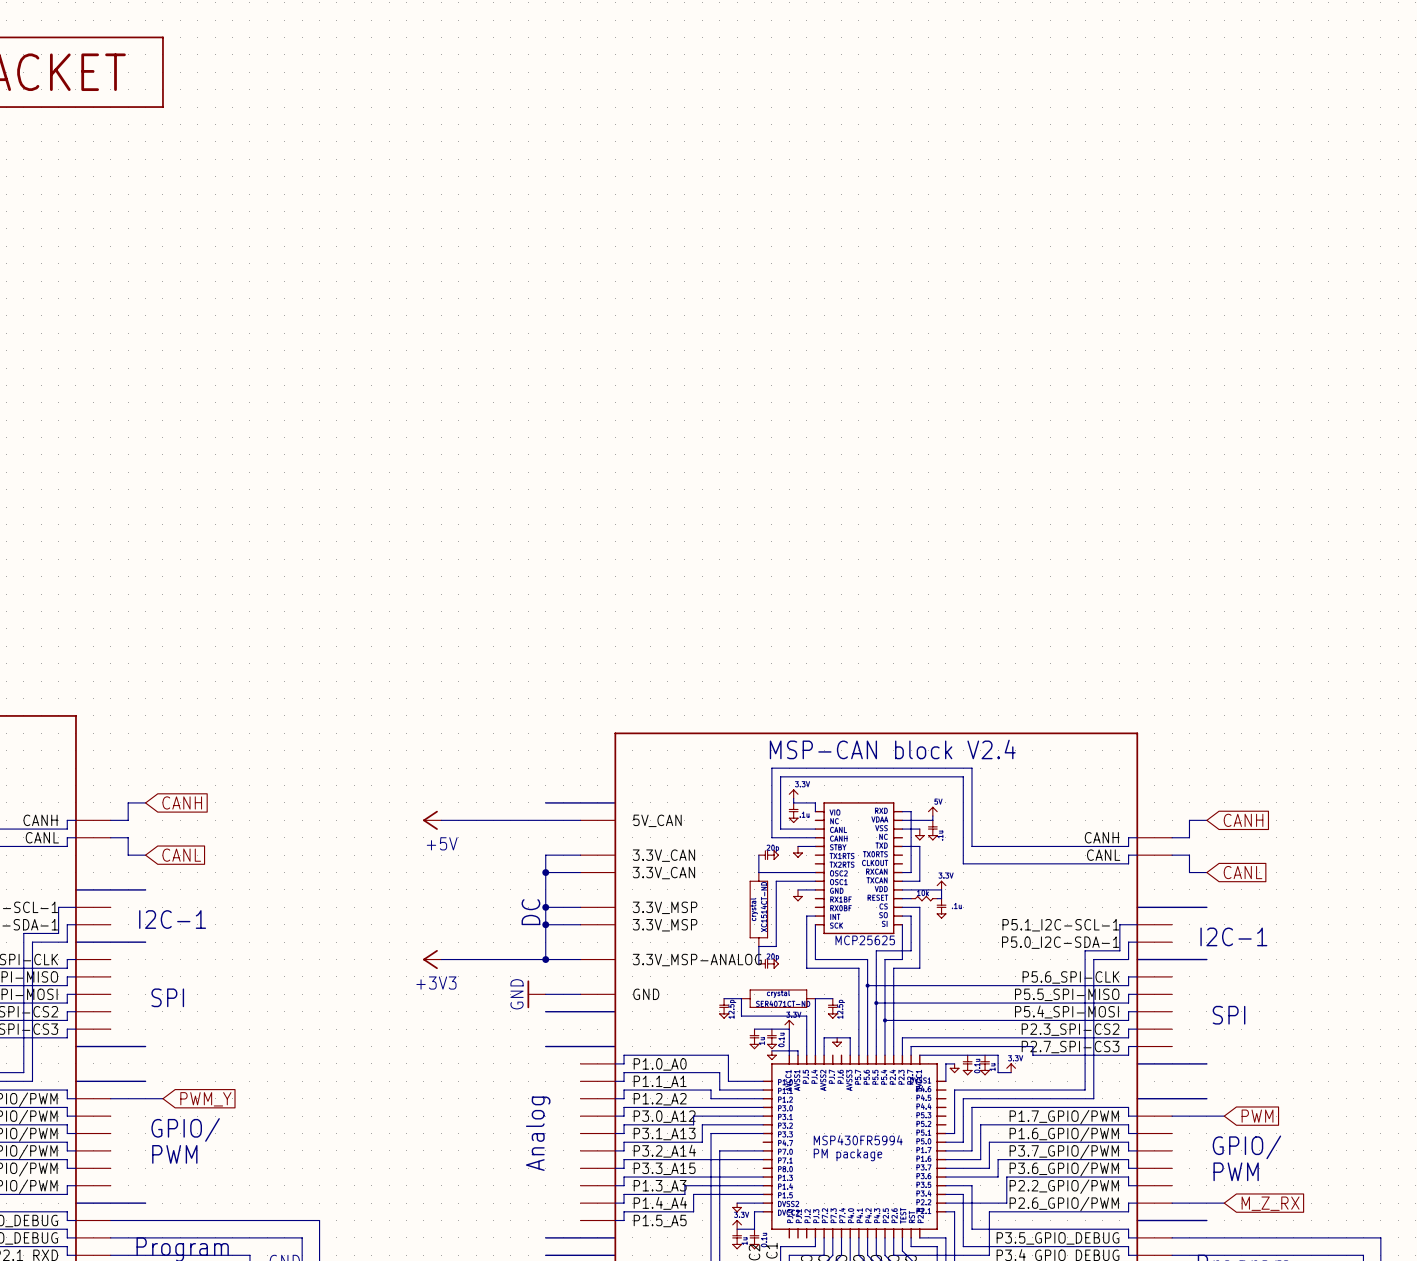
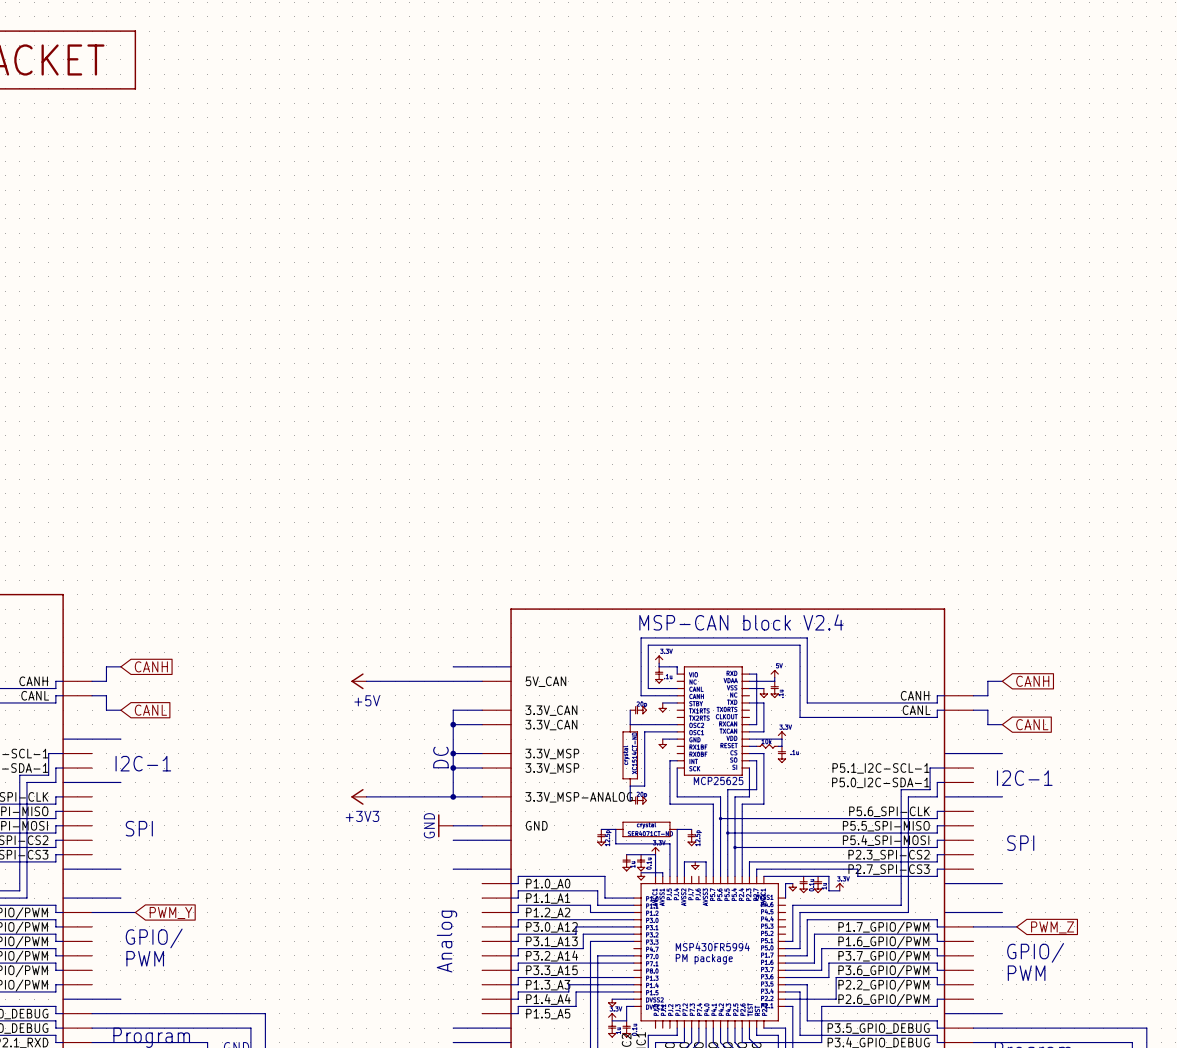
global label: PWM (1257, 1116) -> PWM_Z (1052, 927)
wire: (1172, 1203) (1224, 1203) -> none
global label: M_Z_RX (1270, 1203) -> none

